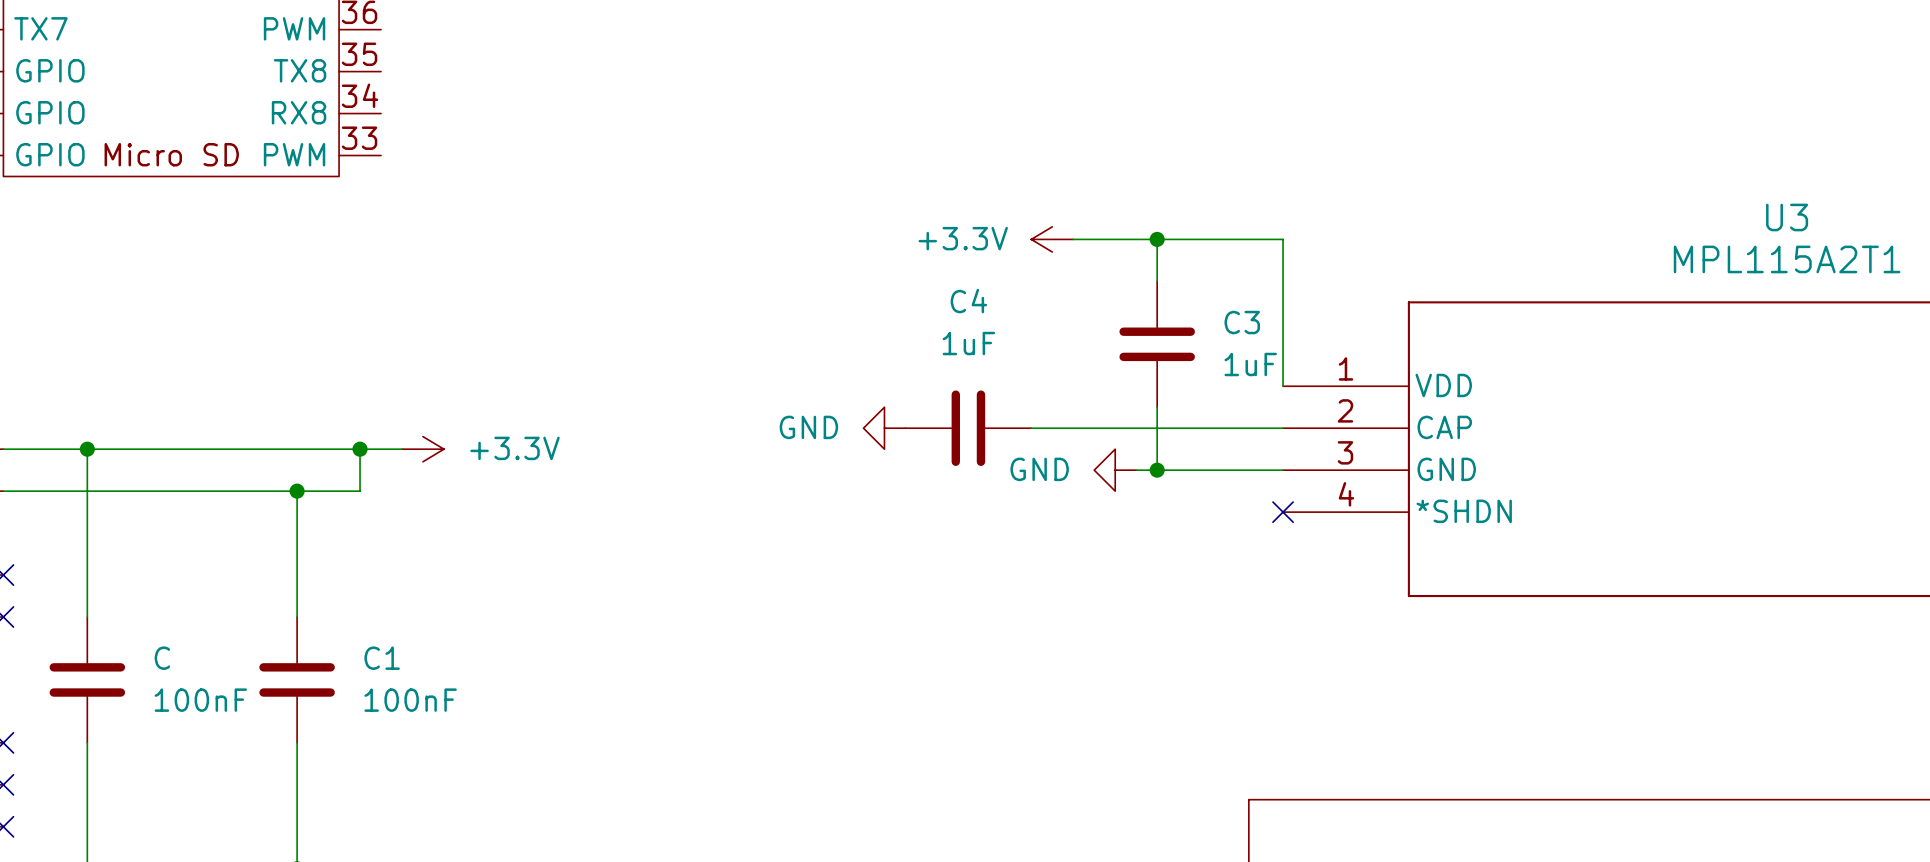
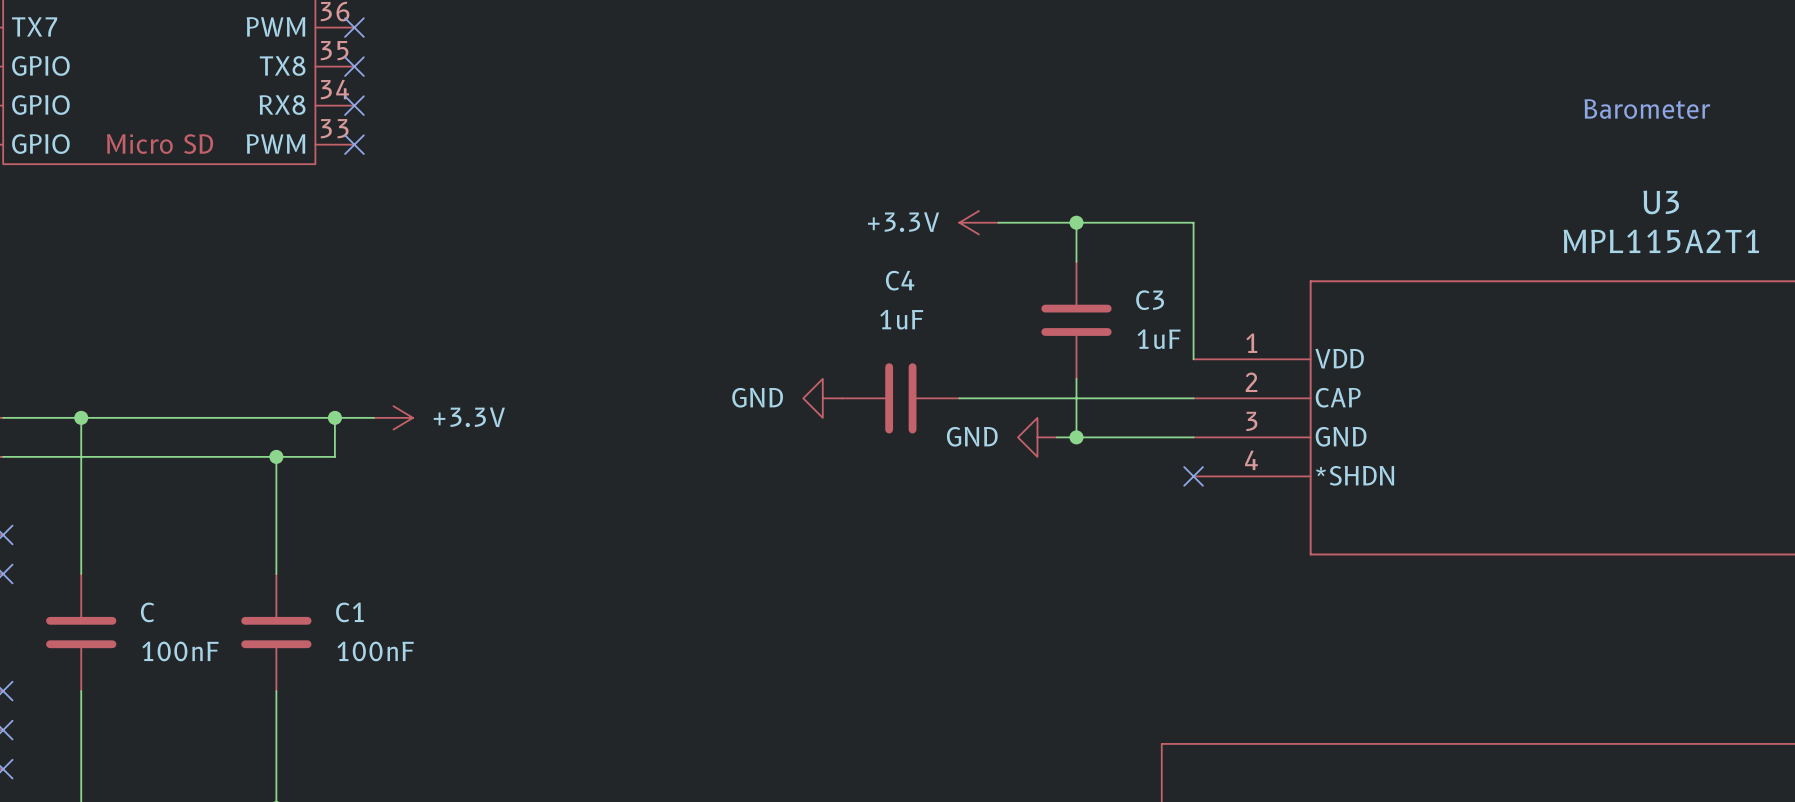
no-connect mark: none -> (354, 27)
no-connect mark: none -> (354, 66)
no-connect mark: none -> (354, 105)
text: none -> Barometer (1647, 109)
no-connect mark: none -> (354, 144)

